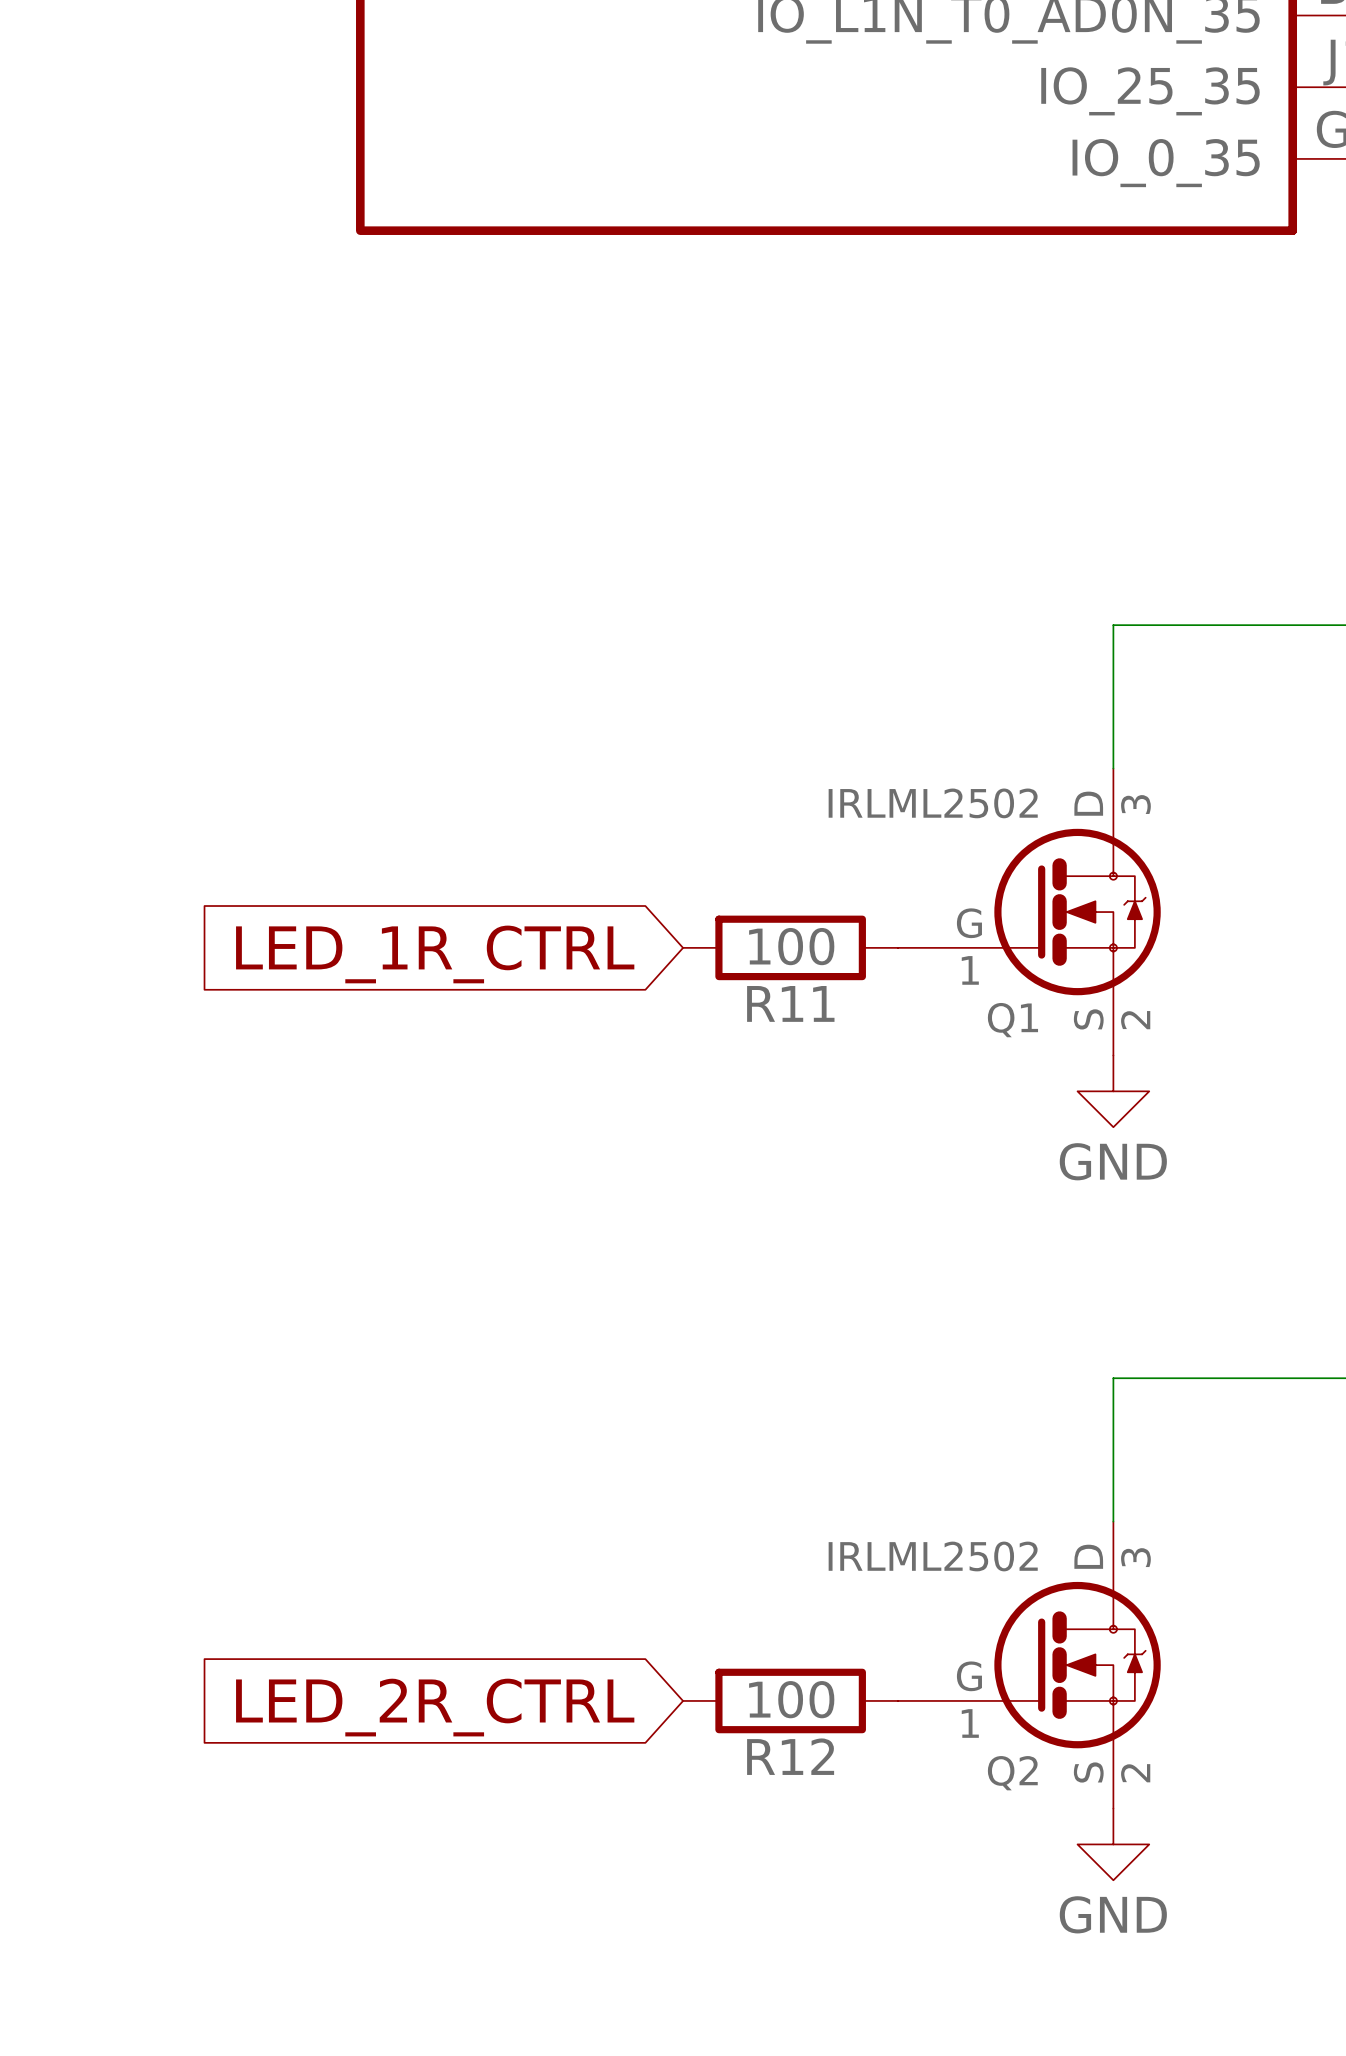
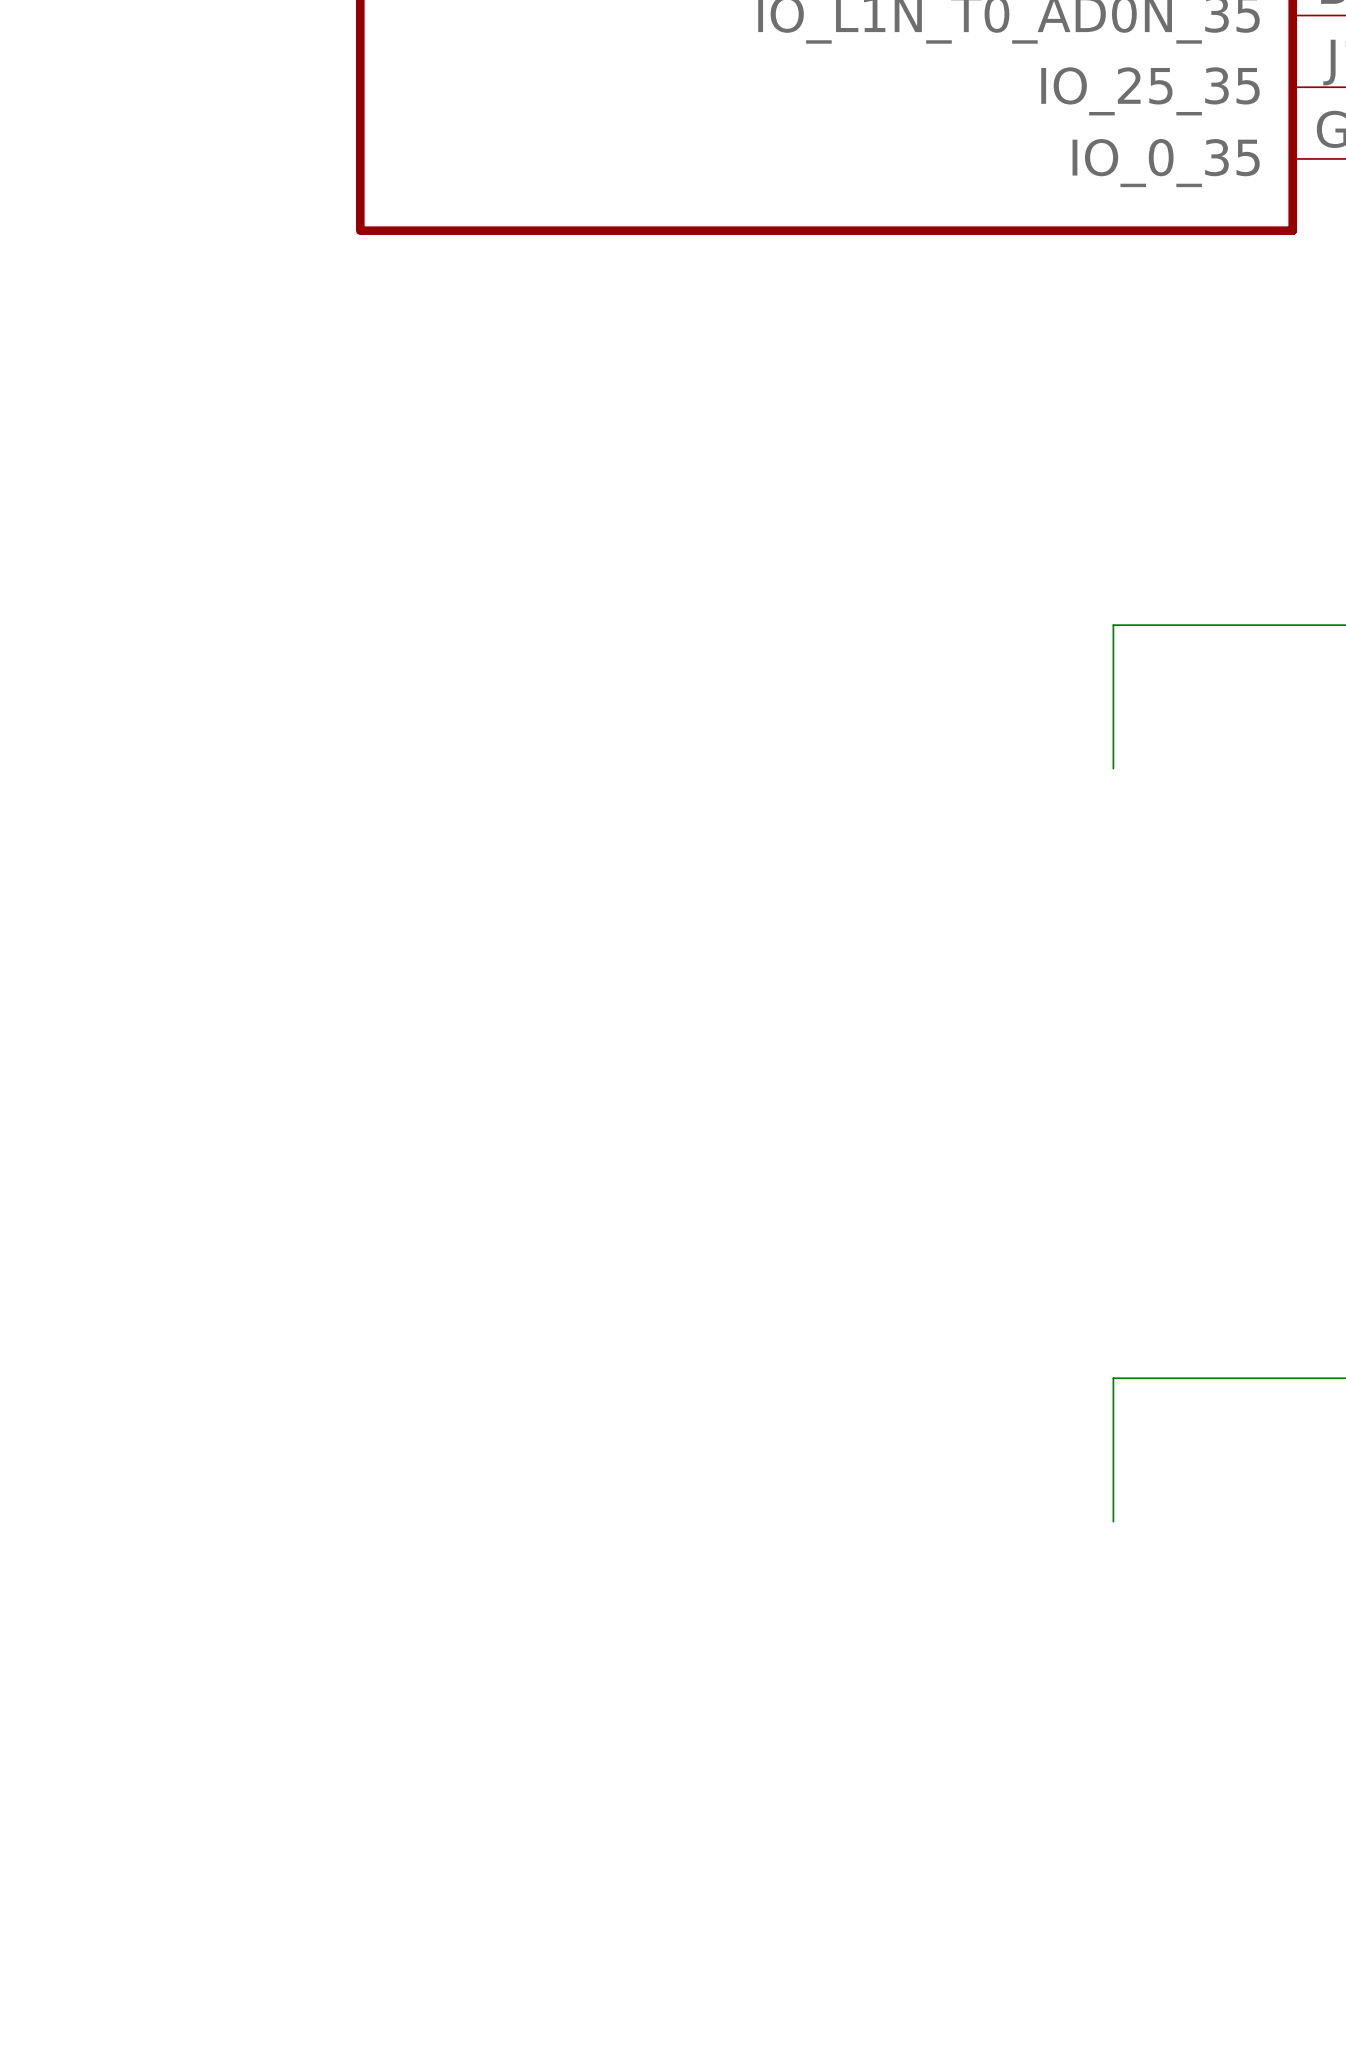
Q1: IRLML2502 (1029, 912) -> none
R11: 100 (790, 947) -> none
global label: LED_1R_CTRL (435, 954) -> none
power symbol: GND (1113, 1091) -> none
Q2: IRLML2502 (1029, 1665) -> none
R12: 100 (790, 1700) -> none
global label: LED_2R_CTRL (435, 1707) -> none
power symbol: GND (1113, 1844) -> none

